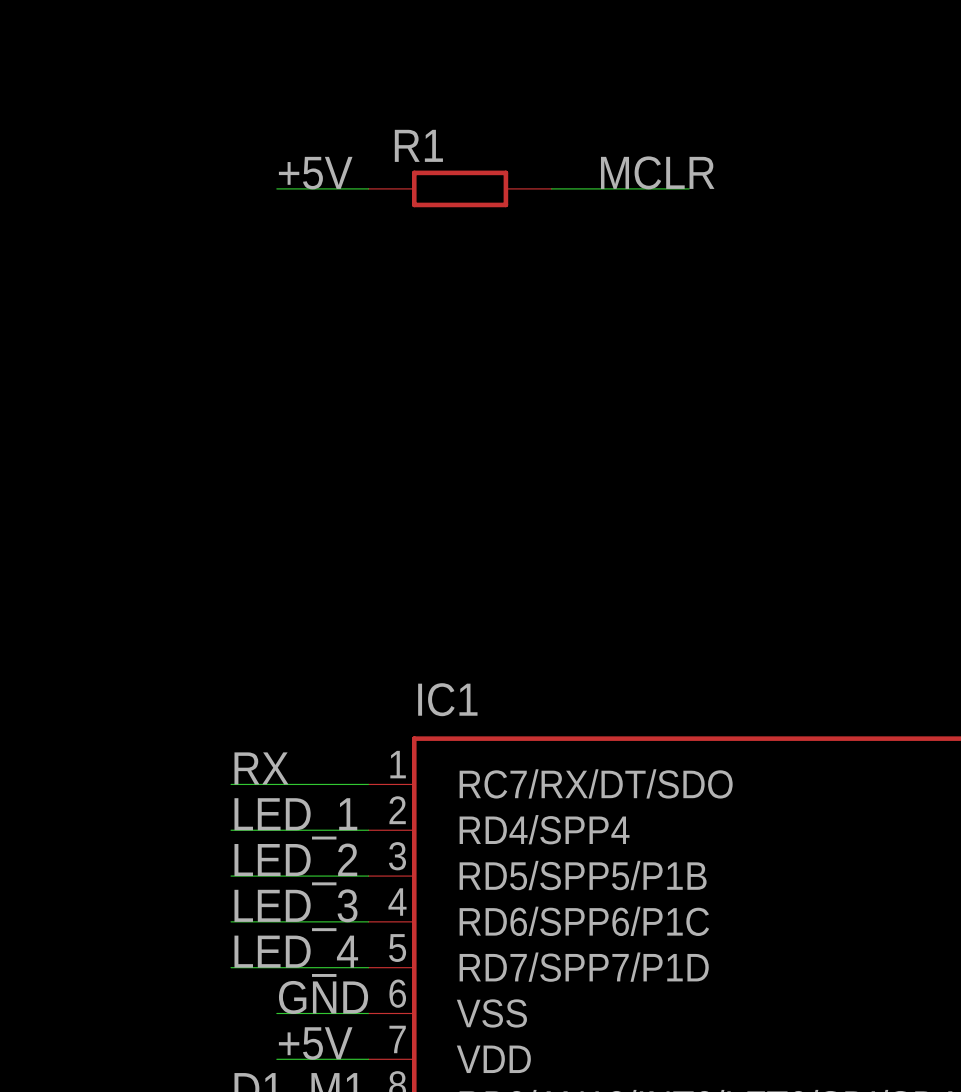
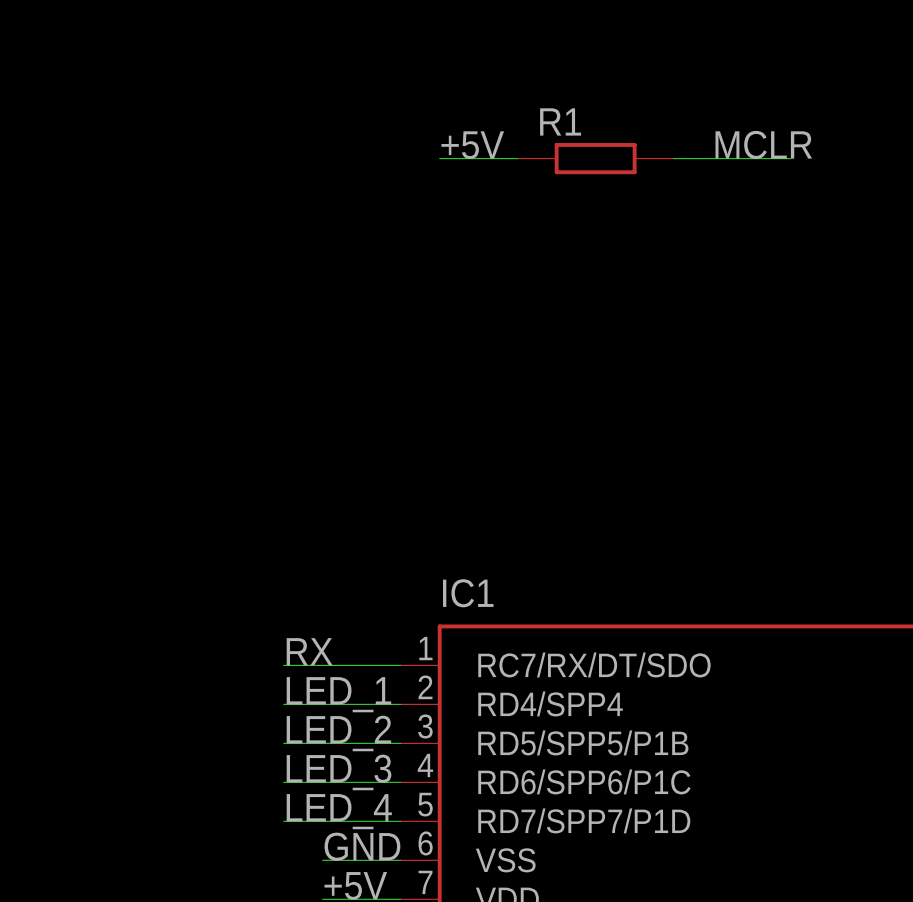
label position: MCLR (657, 172) -> MCLR (763, 144)
label position: +5V (315, 173) -> +5V (472, 145)
wire: (276, 188) (368, 188) -> (439, 158) (517, 158)
R1 position: (460, 188) -> (595, 158)
wire: (551, 188) (689, 188) -> (790, 158) (673, 158)

